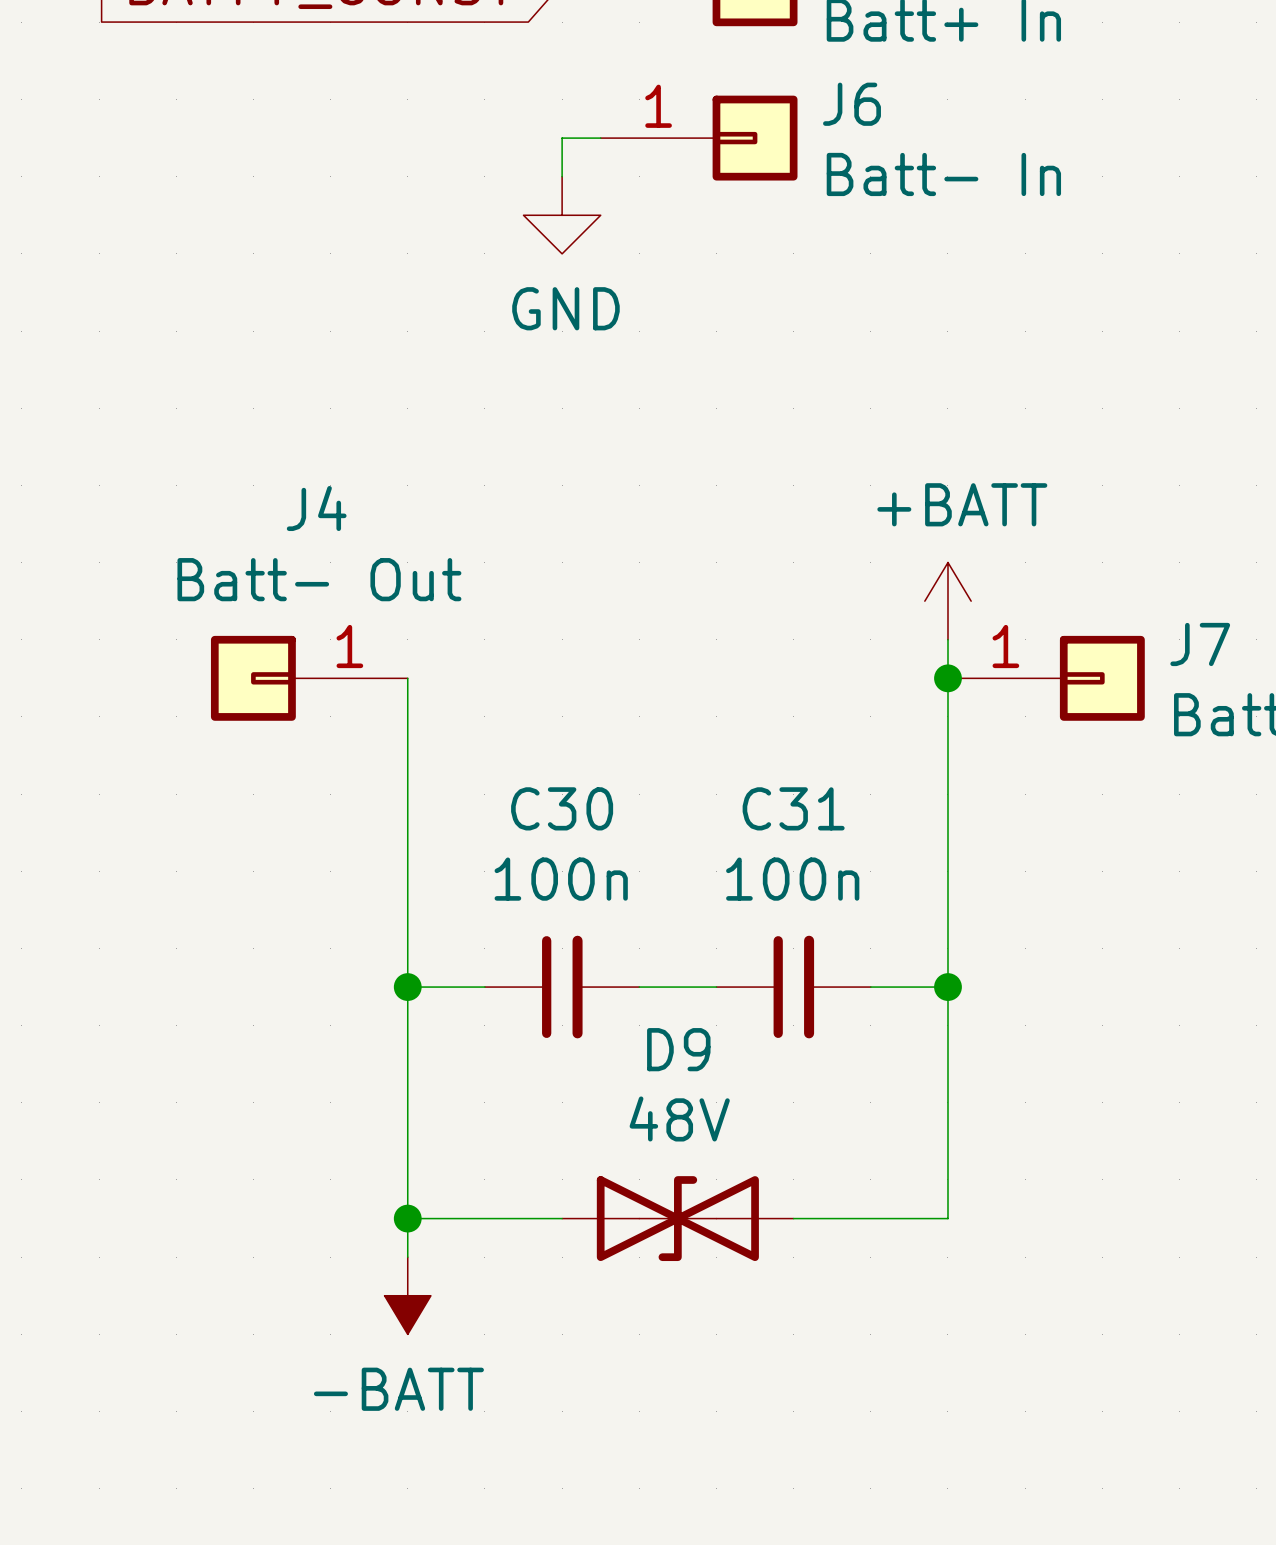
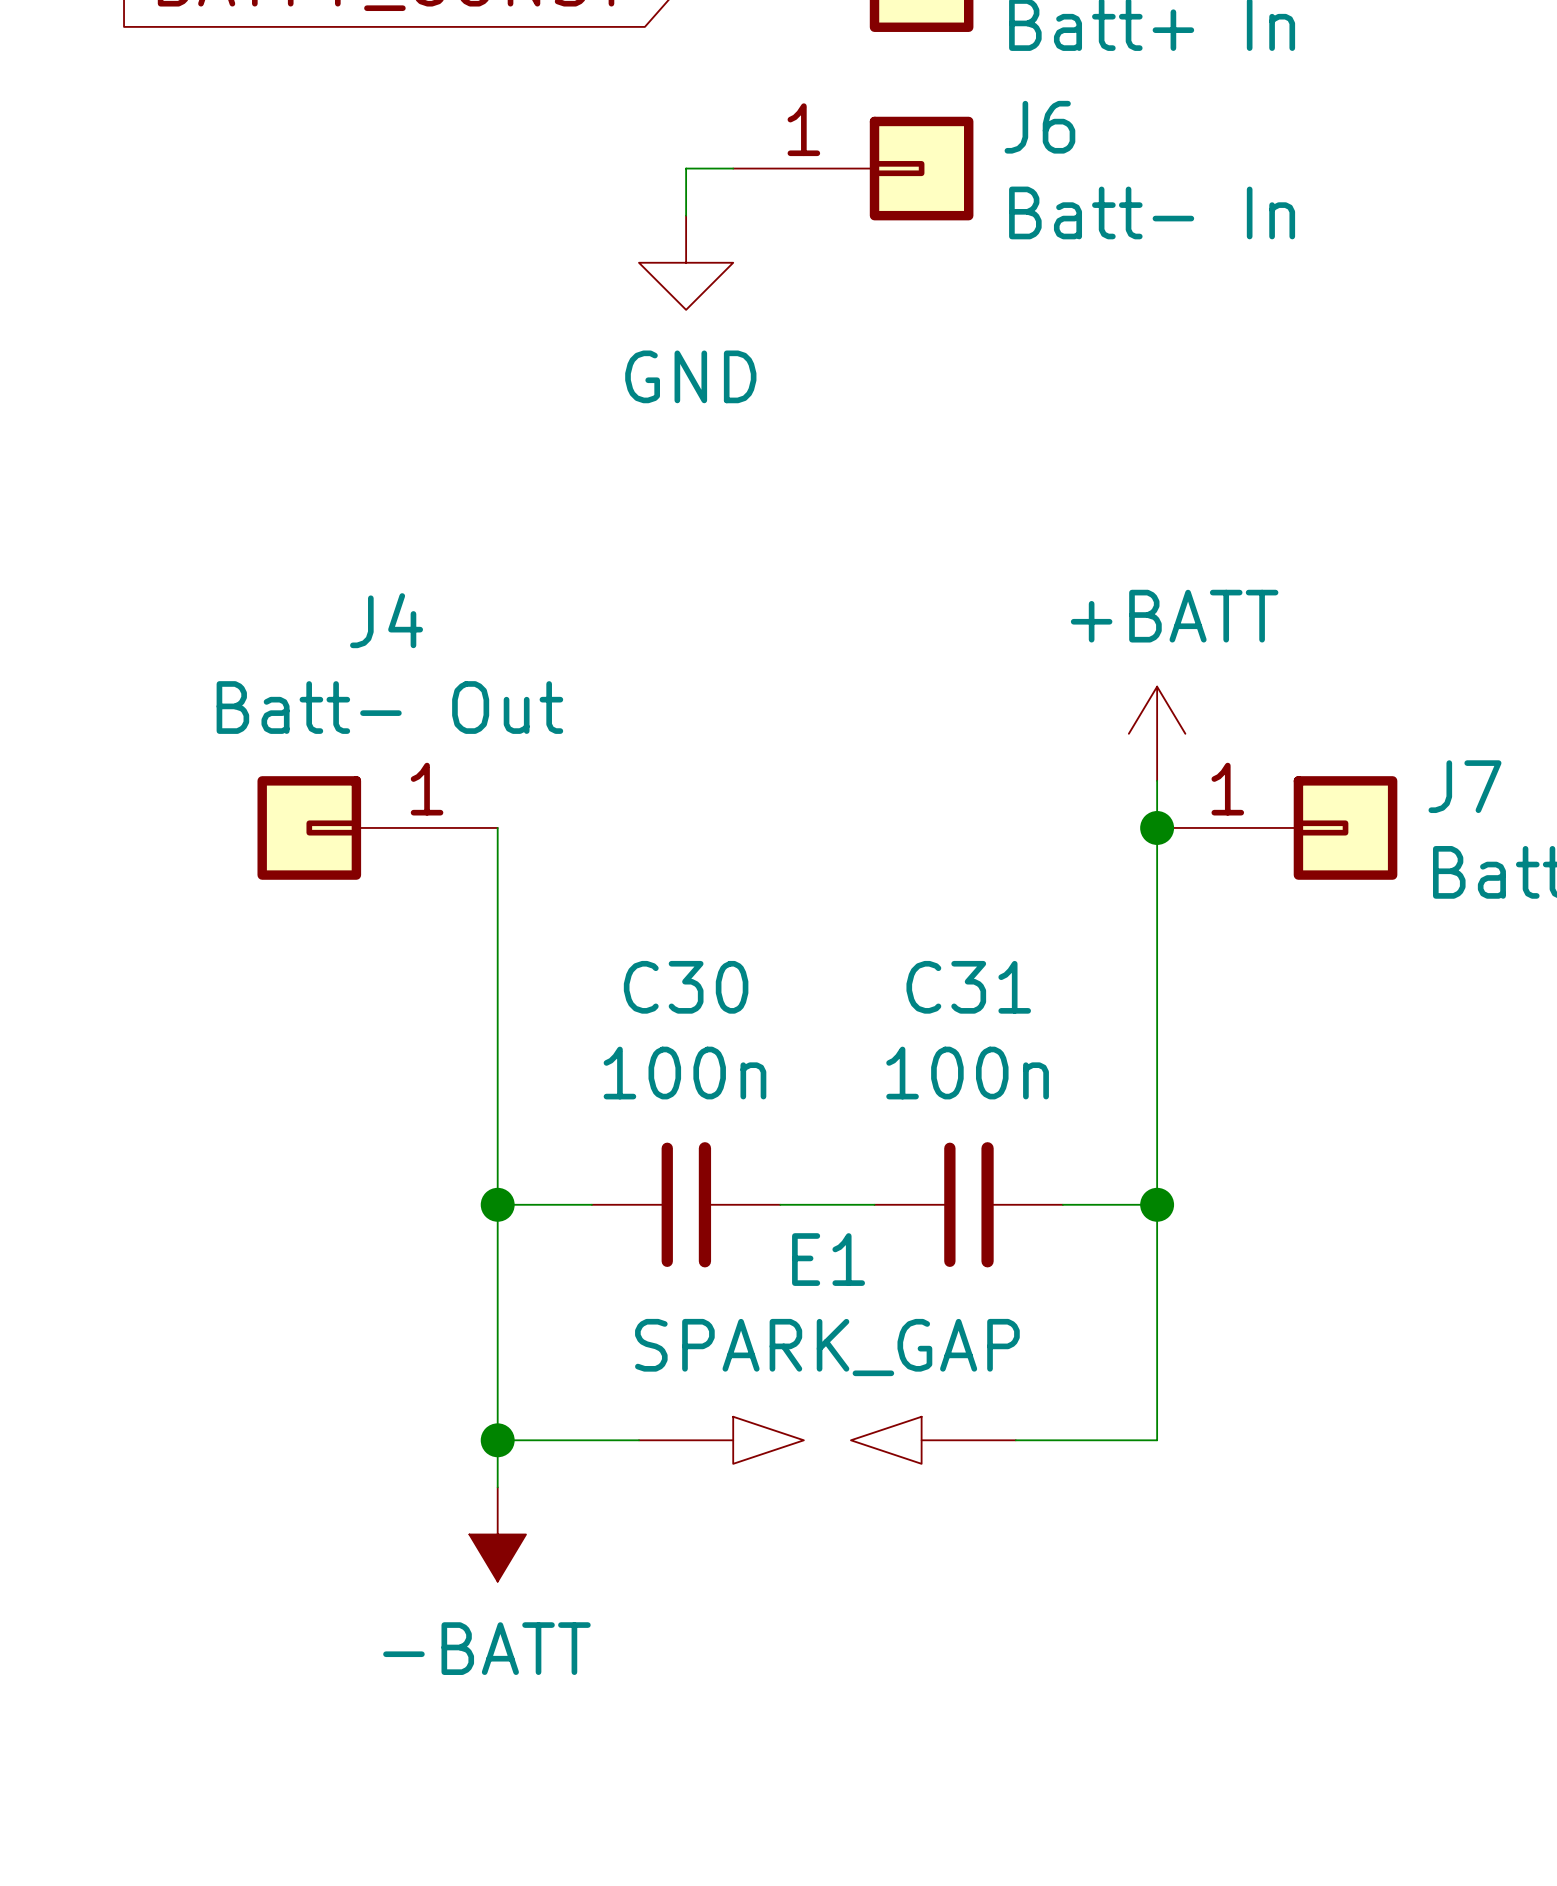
wire: none -> (497, 1440) (639, 1440)
E1: none -> SPARK_GAP (827, 1440)
wire: (947, 1179) (947, 1218) (793, 1218) -> (1157, 1440) (1015, 1440)
junction position: (407, 1218) -> (497, 1440)
wire: (562, 1218) (407, 1218) (407, 1257) -> none
D9: 48V (677, 1218) -> none
power symbol position: -BATT (407, 1295) -> -BATT (497, 1534)

